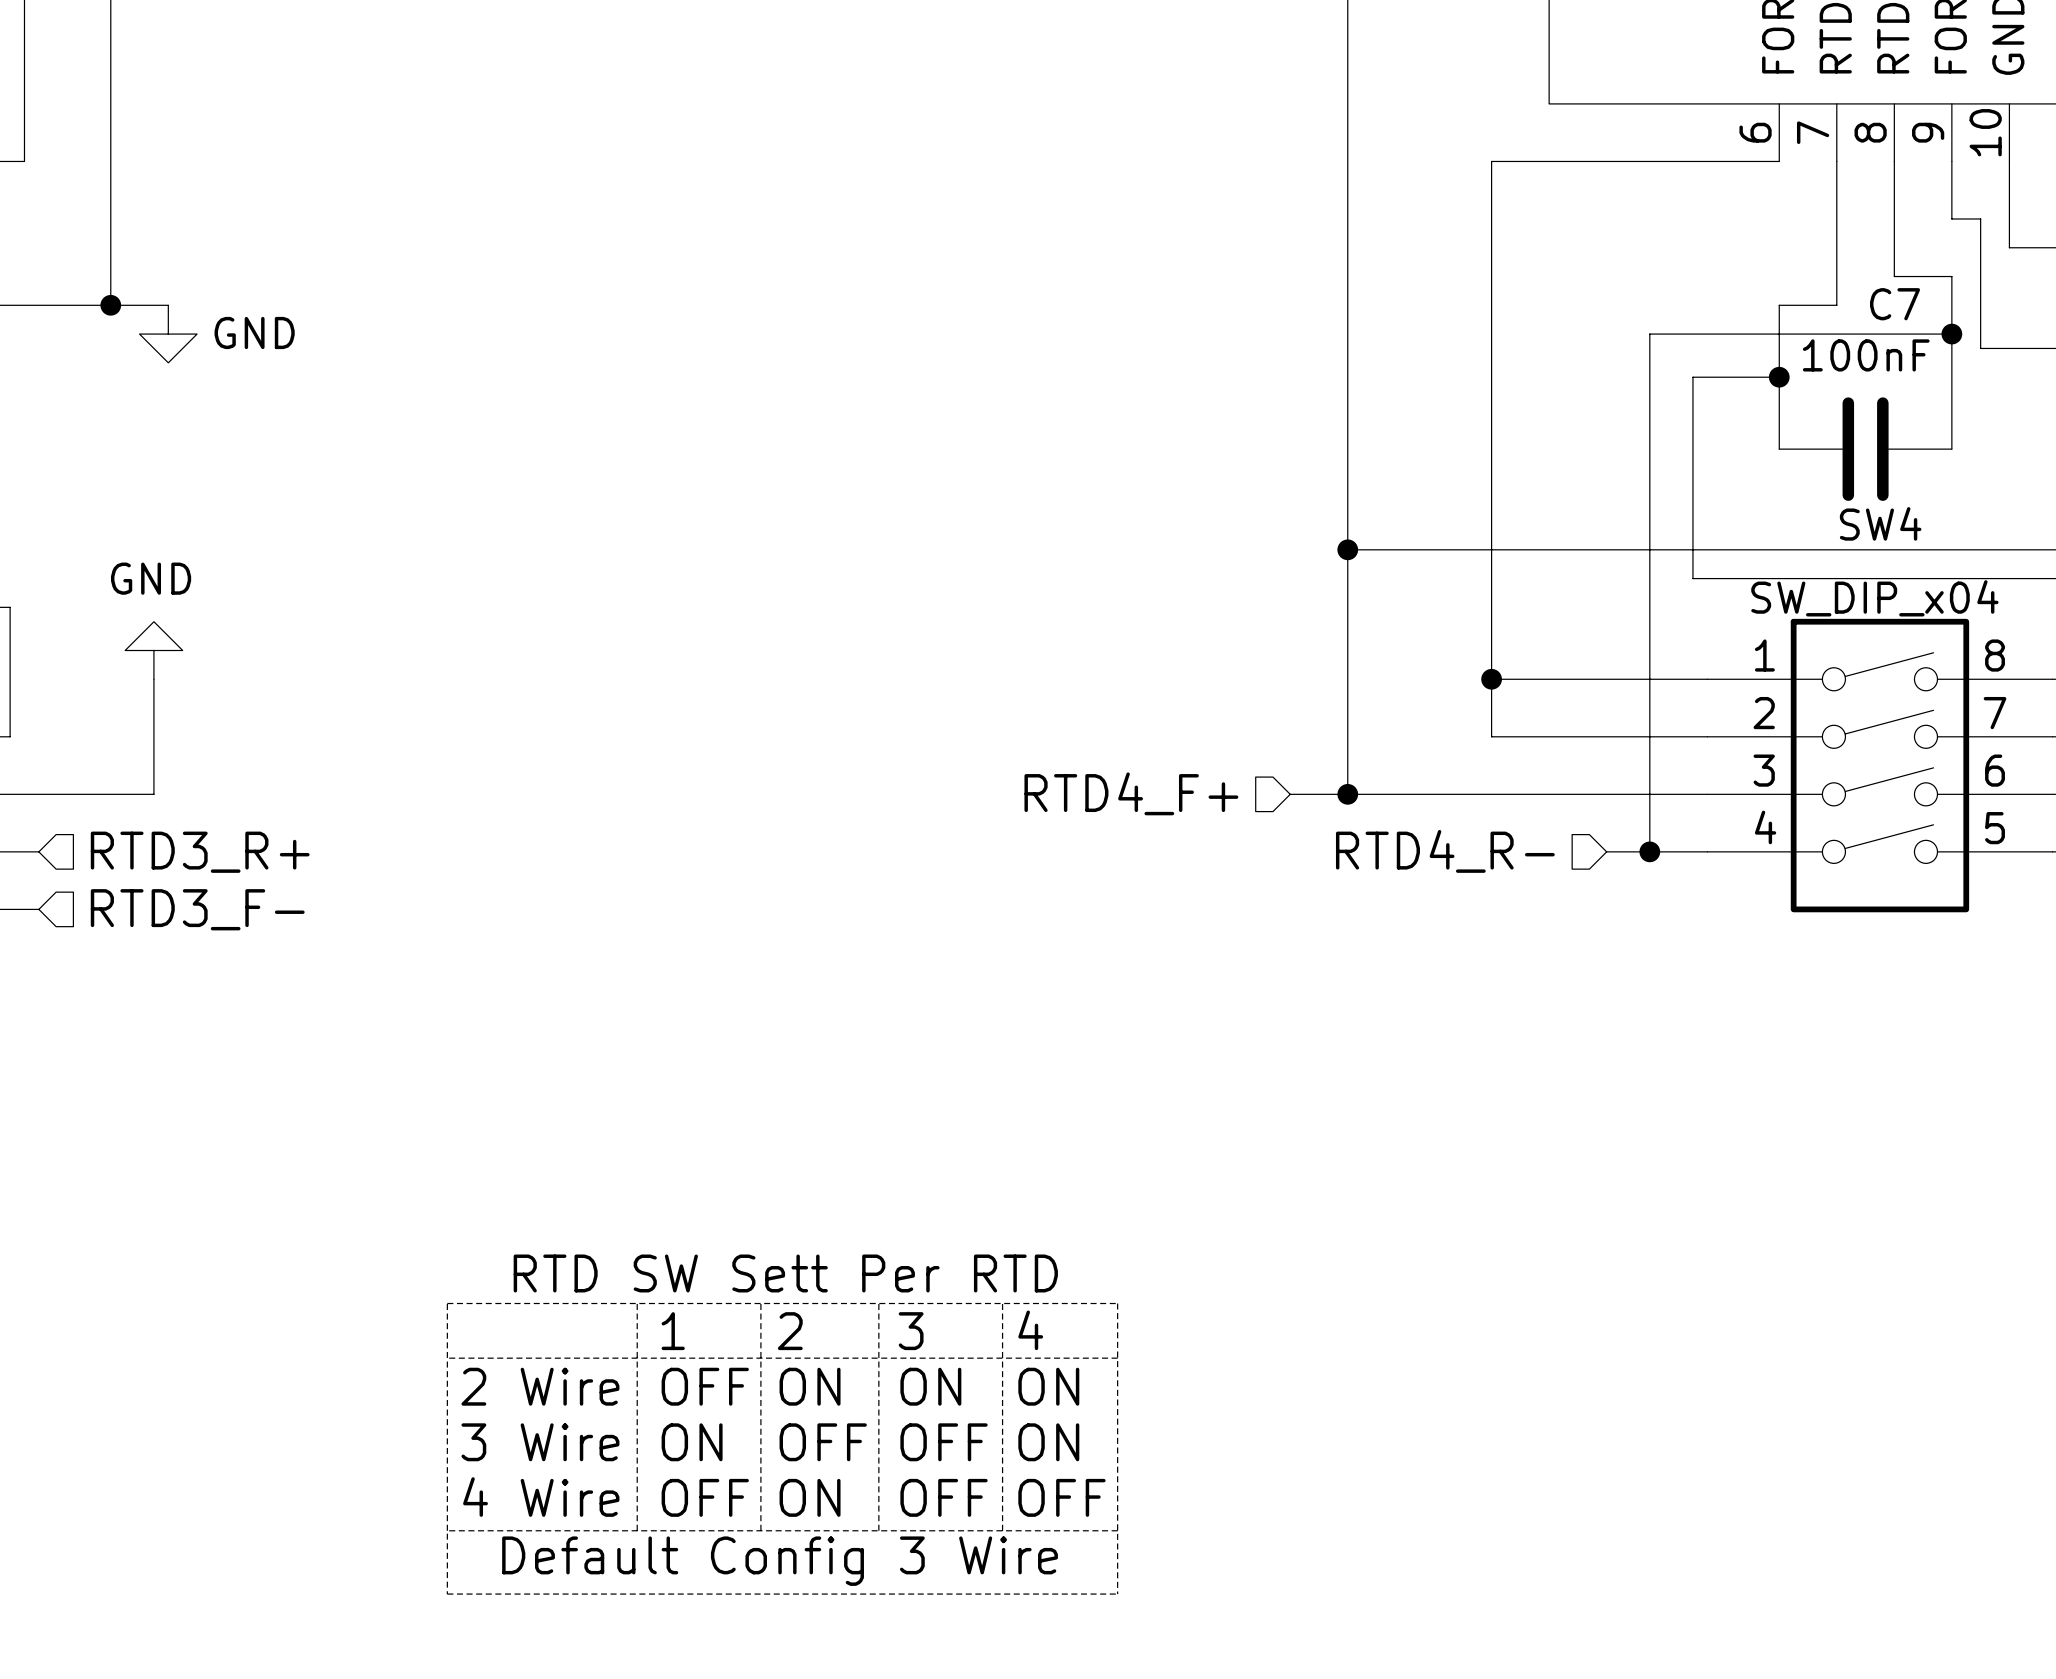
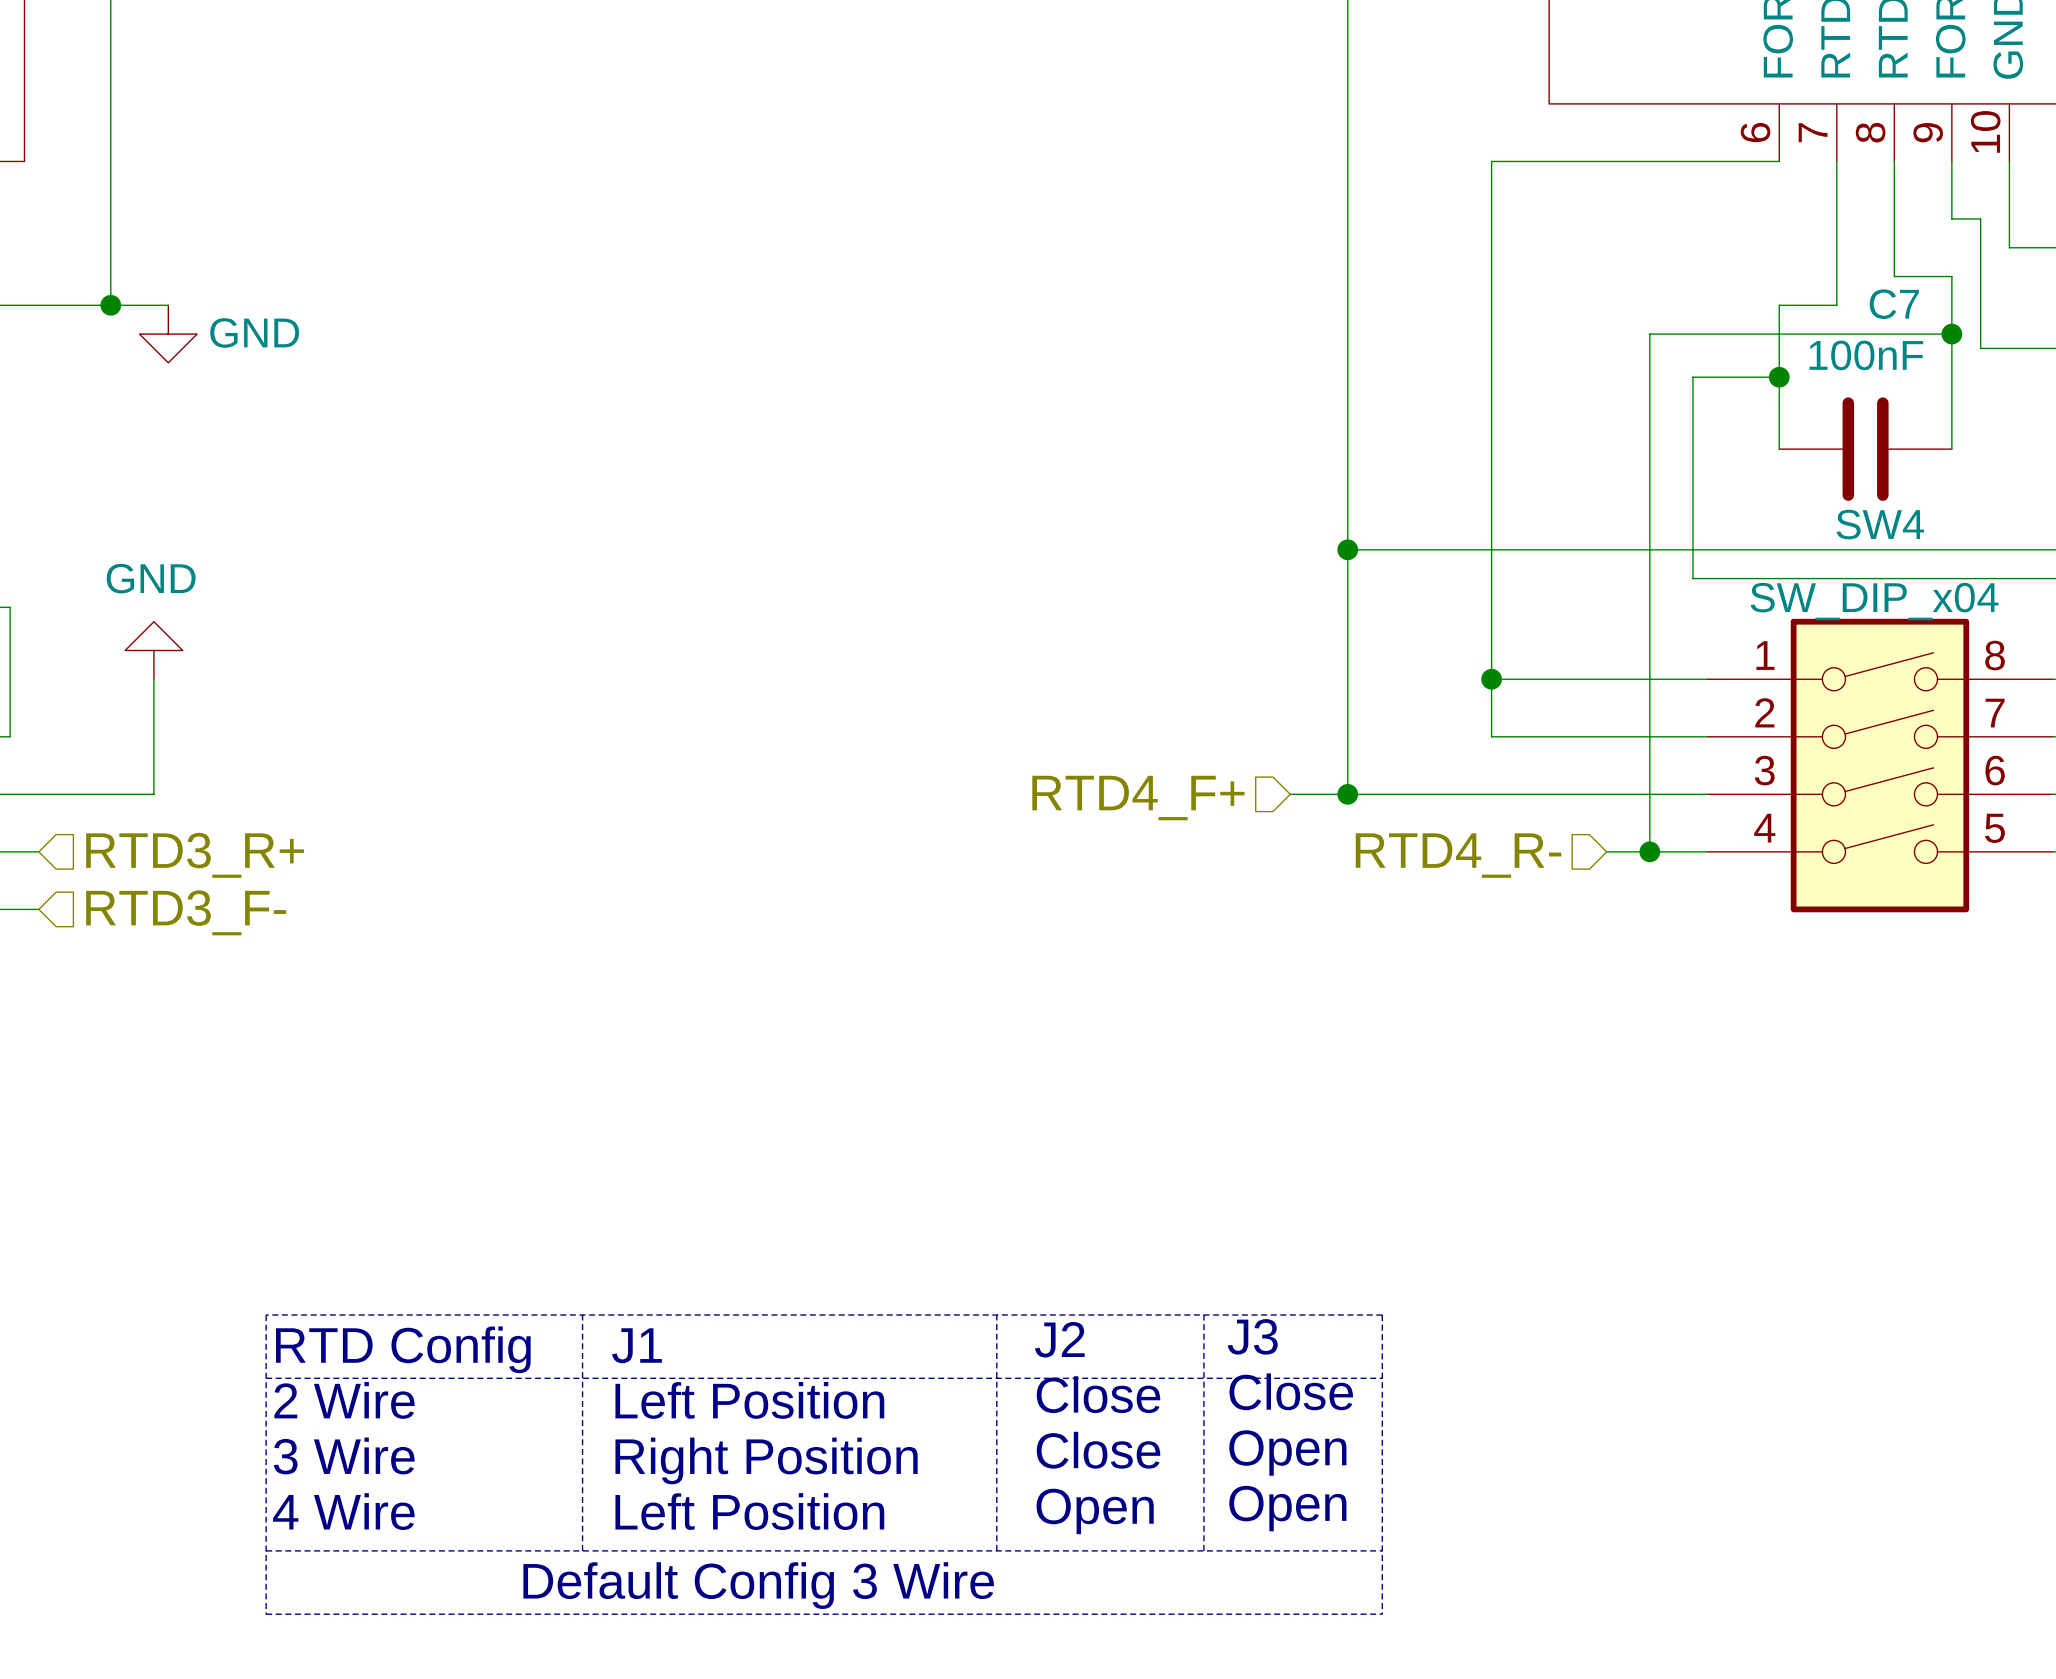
text: RTD SW Sett Per RTD (785, 1273) -> none
line: (637, 1303) (637, 1530) -> none
line: (760, 1303) (760, 1530) -> none
line: (878, 1303) (878, 1530) -> none
line: (1002, 1303) (1002, 1530) -> none
line: none -> (266, 1315) (1382, 1315) (1382, 1614) (266, 1614) (266, 1315)
line: none -> (582, 1315) (582, 1550)
line: none -> (996, 1315) (996, 1550)
line: none -> (1203, 1315) (1203, 1550)
text: 4 (1030, 1330) -> none
text: 1 (673, 1331) -> J1 (636, 1345)
text: 2 (790, 1331) -> none
text: 3 (911, 1331) -> none
text: none -> J3 (1252, 1336)
text: none -> J2 (1059, 1339)
text: none -> RTD Config (403, 1349)
line: (447, 1358) (1117, 1358) -> none
line: none -> (266, 1378) (1382, 1378)
text position: 2 Wire (540, 1386) -> 2 Wire (344, 1400)
text: OFF (705, 1386) -> none
text: ON (810, 1386) -> none
text: ON (930, 1386) -> none
text: ON (1048, 1386) -> none
text: none -> Close (1291, 1391)
text: none -> Close (1098, 1394)
text: none -> Left Position (749, 1400)
text position: 3 Wire (540, 1442) -> 3 Wire (344, 1456)
text: ON (692, 1442) -> none
text: OFF (823, 1442) -> none
text: OFF (944, 1442) -> none
text: ON (1048, 1442) -> none
text: none -> Close (1098, 1450)
text: none -> Open (1287, 1452)
text: none -> Right Position (766, 1460)
text position: 4 Wire (541, 1497) -> 4 Wire (343, 1511)
text: OFF (705, 1497) -> none
text: ON (810, 1497) -> none
text: OFF (944, 1497) -> none
text: OFF (1061, 1497) -> none
text: none -> Open (1287, 1508)
text: none -> Left Position (749, 1511)
text: none -> Open (1095, 1511)
line: (1117, 1530) (447, 1530) (447, 1303) (1117, 1303) (1117, 1594) (447, 1594) (447, 1533) -> none
line: none -> (266, 1550) (1382, 1550)
text position: Default Config 3 Wire (780, 1561) -> Default Config 3 Wire (758, 1585)

